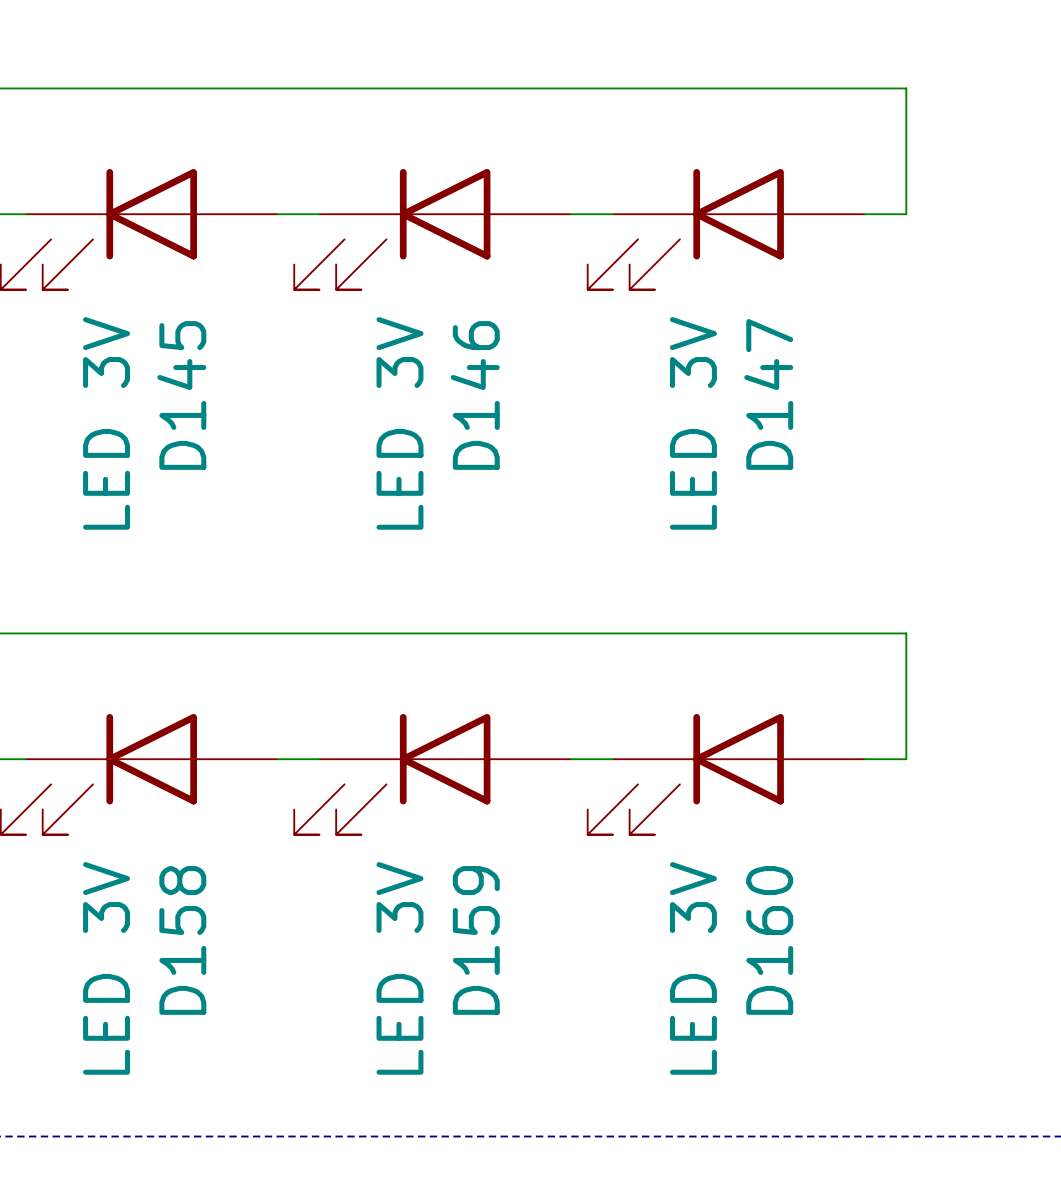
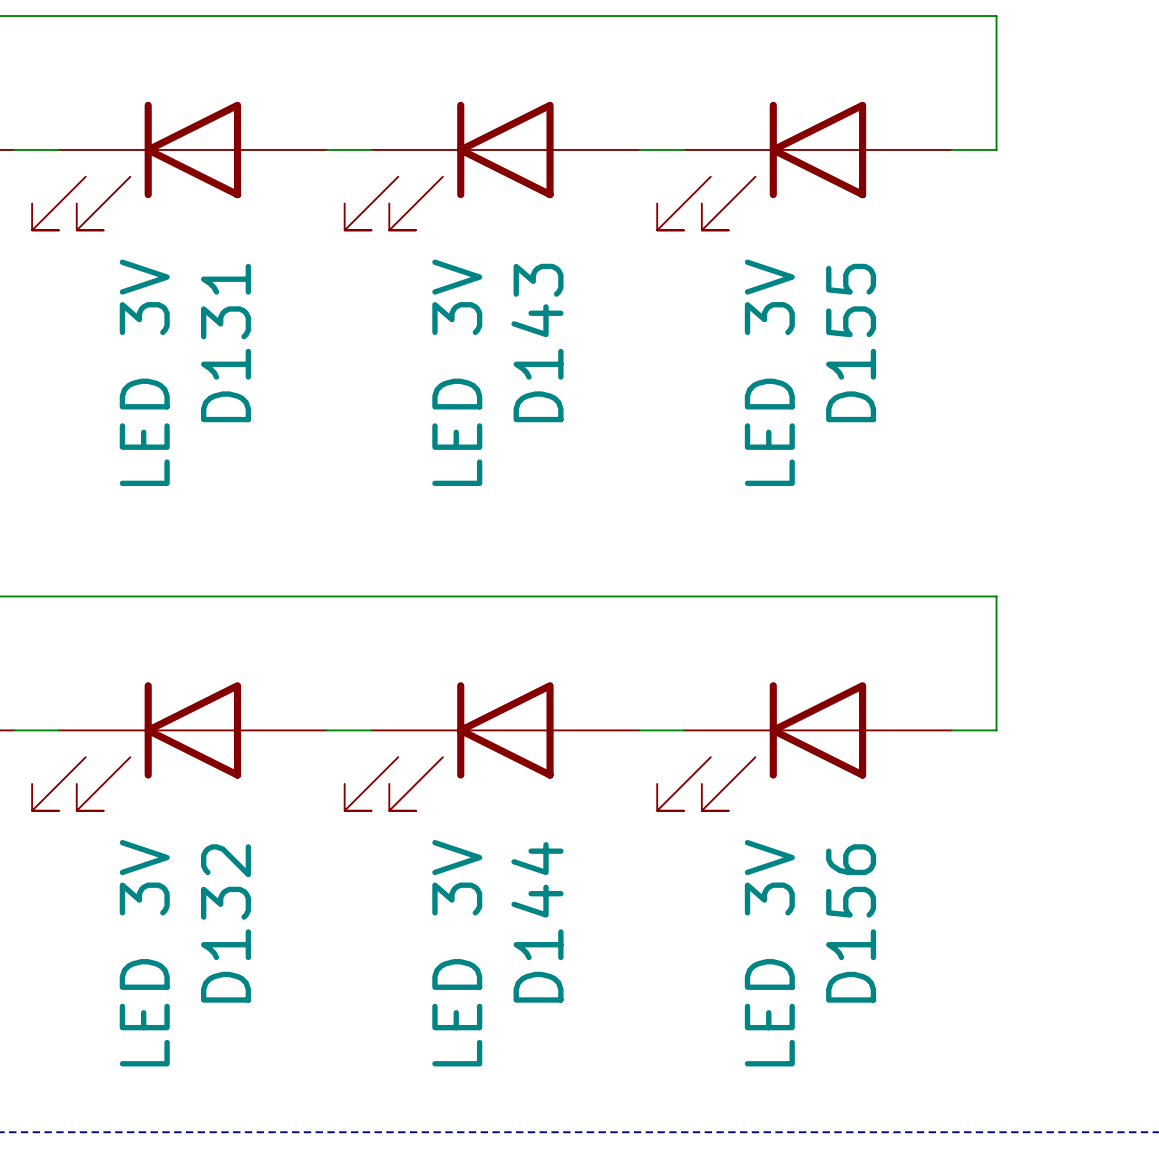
D147 name: D147 (768, 394) -> D155 (851, 343)
D145 name: D145 (181, 395) -> D131 (226, 343)
D146 name: D146 (475, 395) -> D143 (537, 343)
D158 name: D158 (182, 940) -> D132 (226, 923)
D159 name: D159 (476, 940) -> D144 (537, 922)
D160 name: D160 (769, 940) -> D156 (851, 923)

